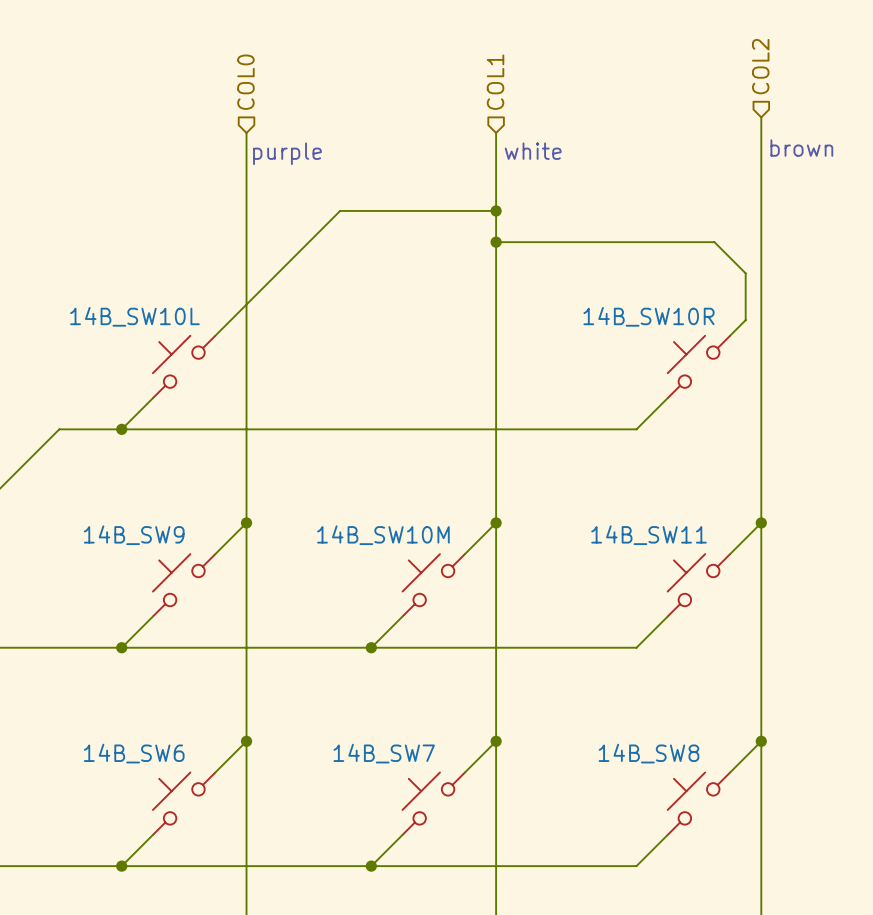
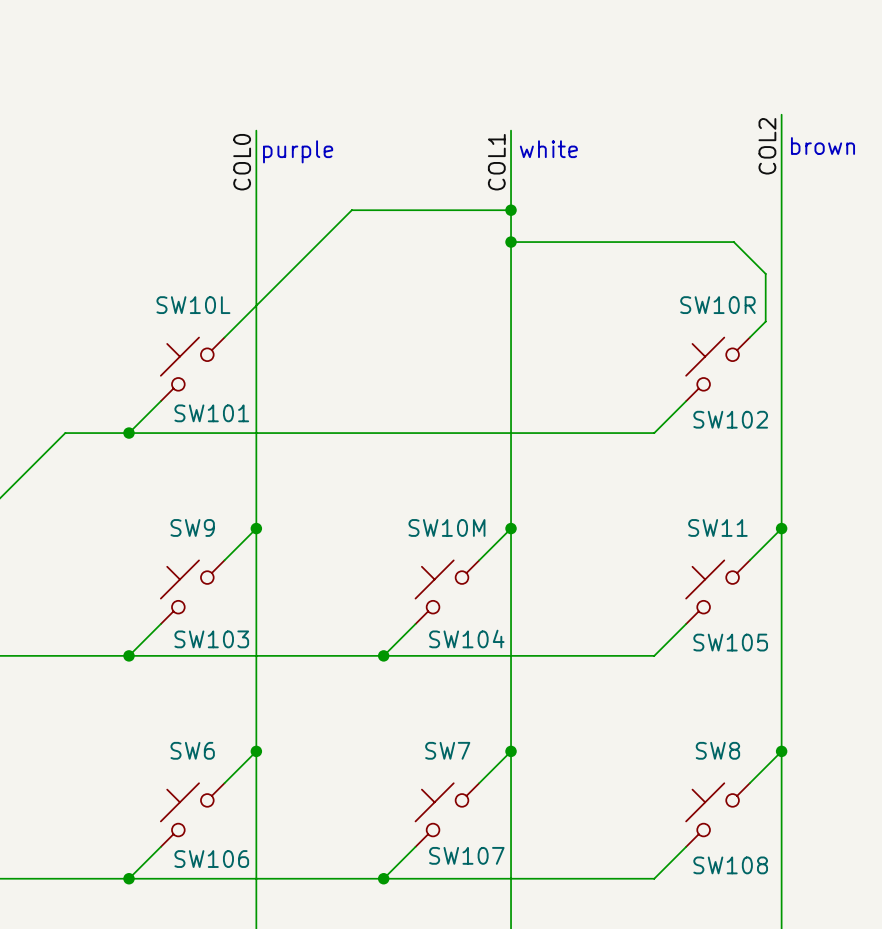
hierarchical label: COL2 (760, 66) -> none
hierarchical label: COL0 (245, 82) -> none
hierarchical label: COL1 (495, 82) -> none
label: none -> COL2 (767, 146)
label: none -> COL0 (242, 162)
label: none -> COL1 (496, 162)
14B_SW10L value: none -> SW10L (193, 305)
14B_SW10R value: none -> SW10R (717, 305)
14B_SW10L name: 14B_SW10L (134, 316) -> SW101 (211, 413)
14B_SW10R name: 14B_SW10R (648, 316) -> SW102 (730, 419)
14B_SW9 value: none -> SW9 (192, 527)
14B_SW10M value: none -> SW10M (446, 527)
14B_SW11 value: none -> SW11 (717, 527)
14B_SW9 name: 14B_SW9 (134, 535) -> SW103 (211, 639)
14B_SW10M name: 14B_SW10M (383, 535) -> SW104 (466, 639)
14B_SW11 name: 14B_SW11 (648, 535) -> SW105 (730, 642)
14B_SW6 value: none -> SW6 (192, 750)
14B_SW7 value: none -> SW7 (447, 750)
14B_SW8 value: none -> SW8 (717, 750)
14B_SW6 name: 14B_SW6 (134, 753) -> SW106 (211, 859)
14B_SW7 name: 14B_SW7 (384, 753) -> SW107 (466, 855)
14B_SW8 name: 14B_SW8 (648, 753) -> SW108 (730, 865)

